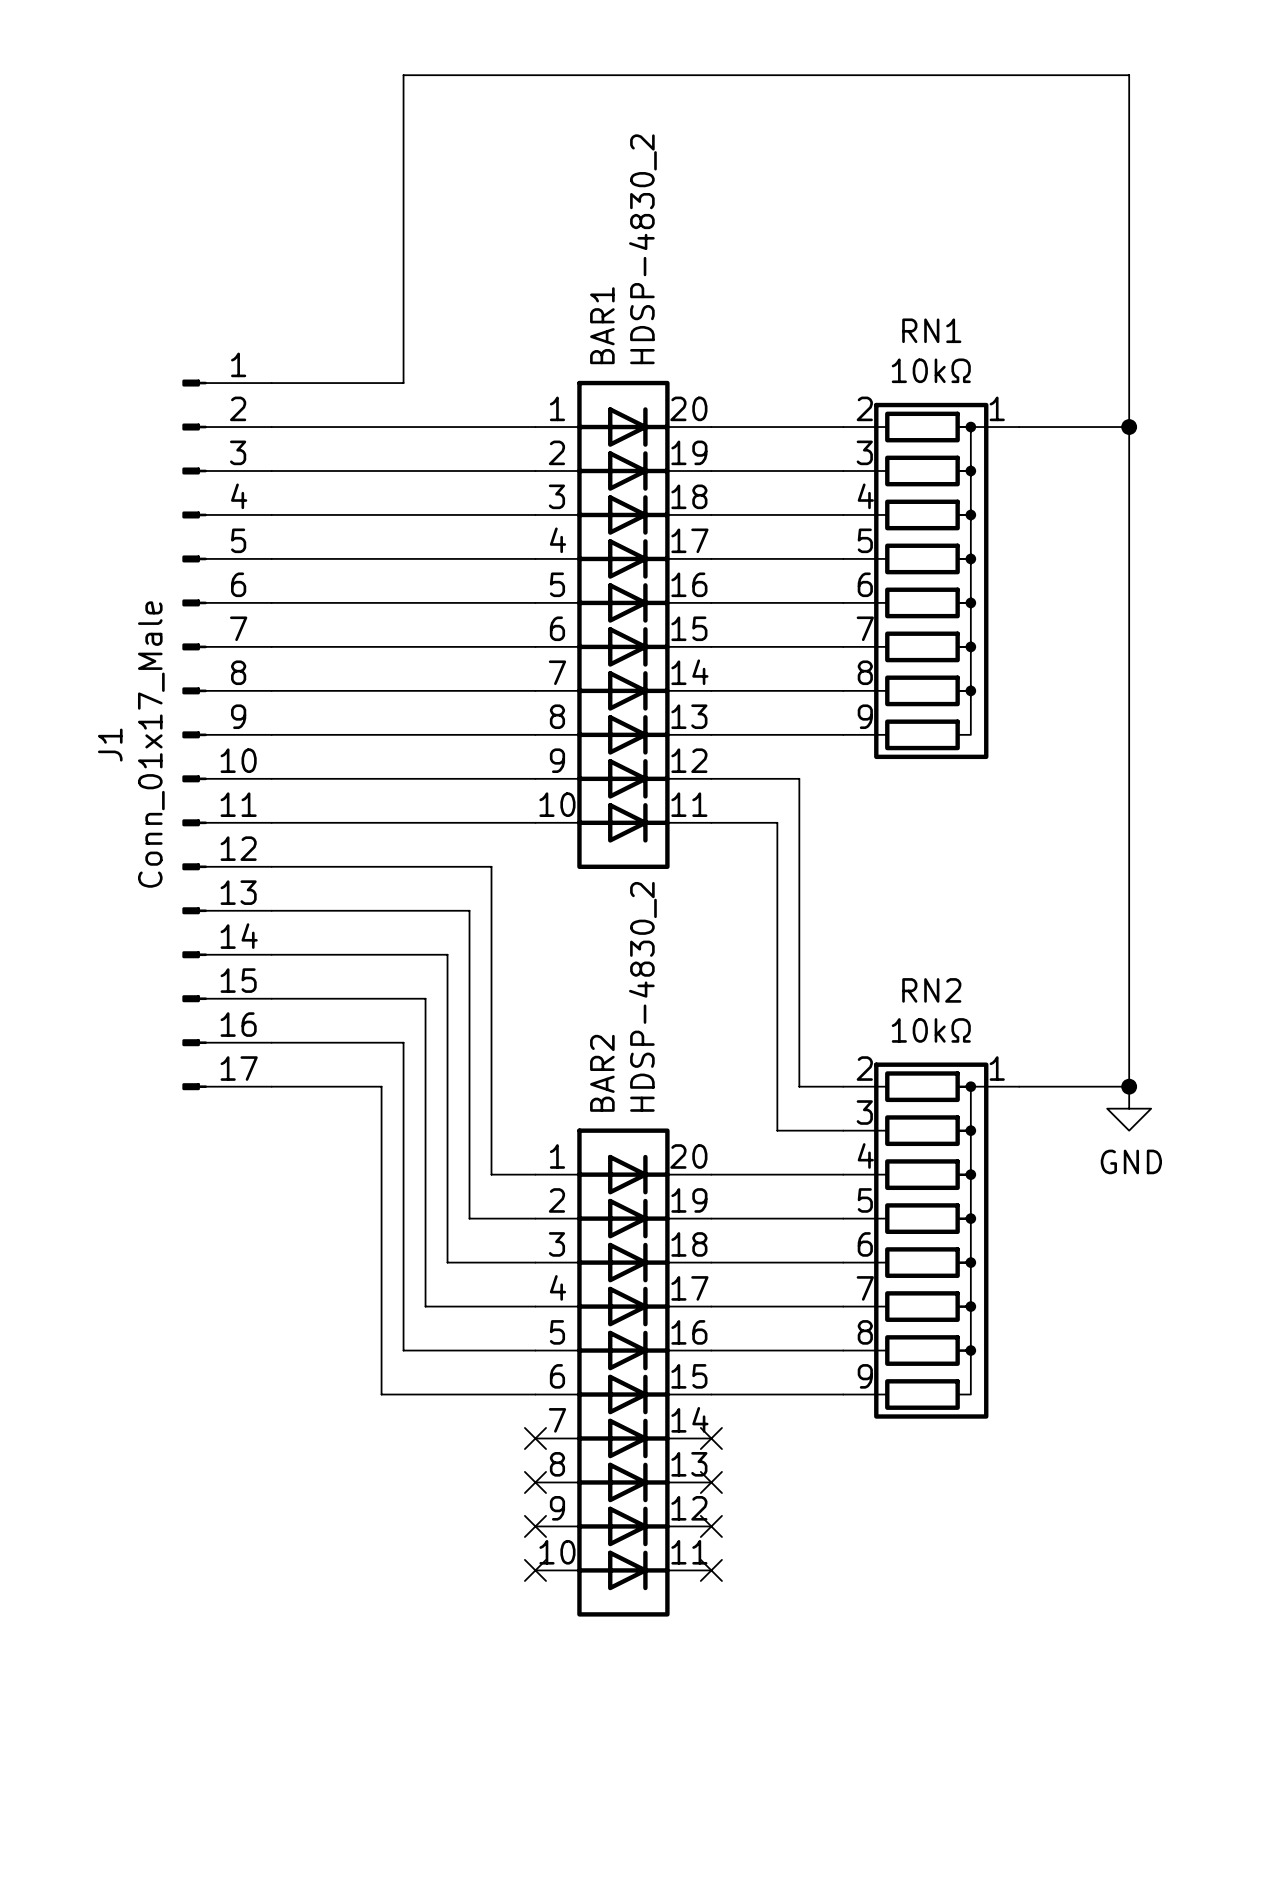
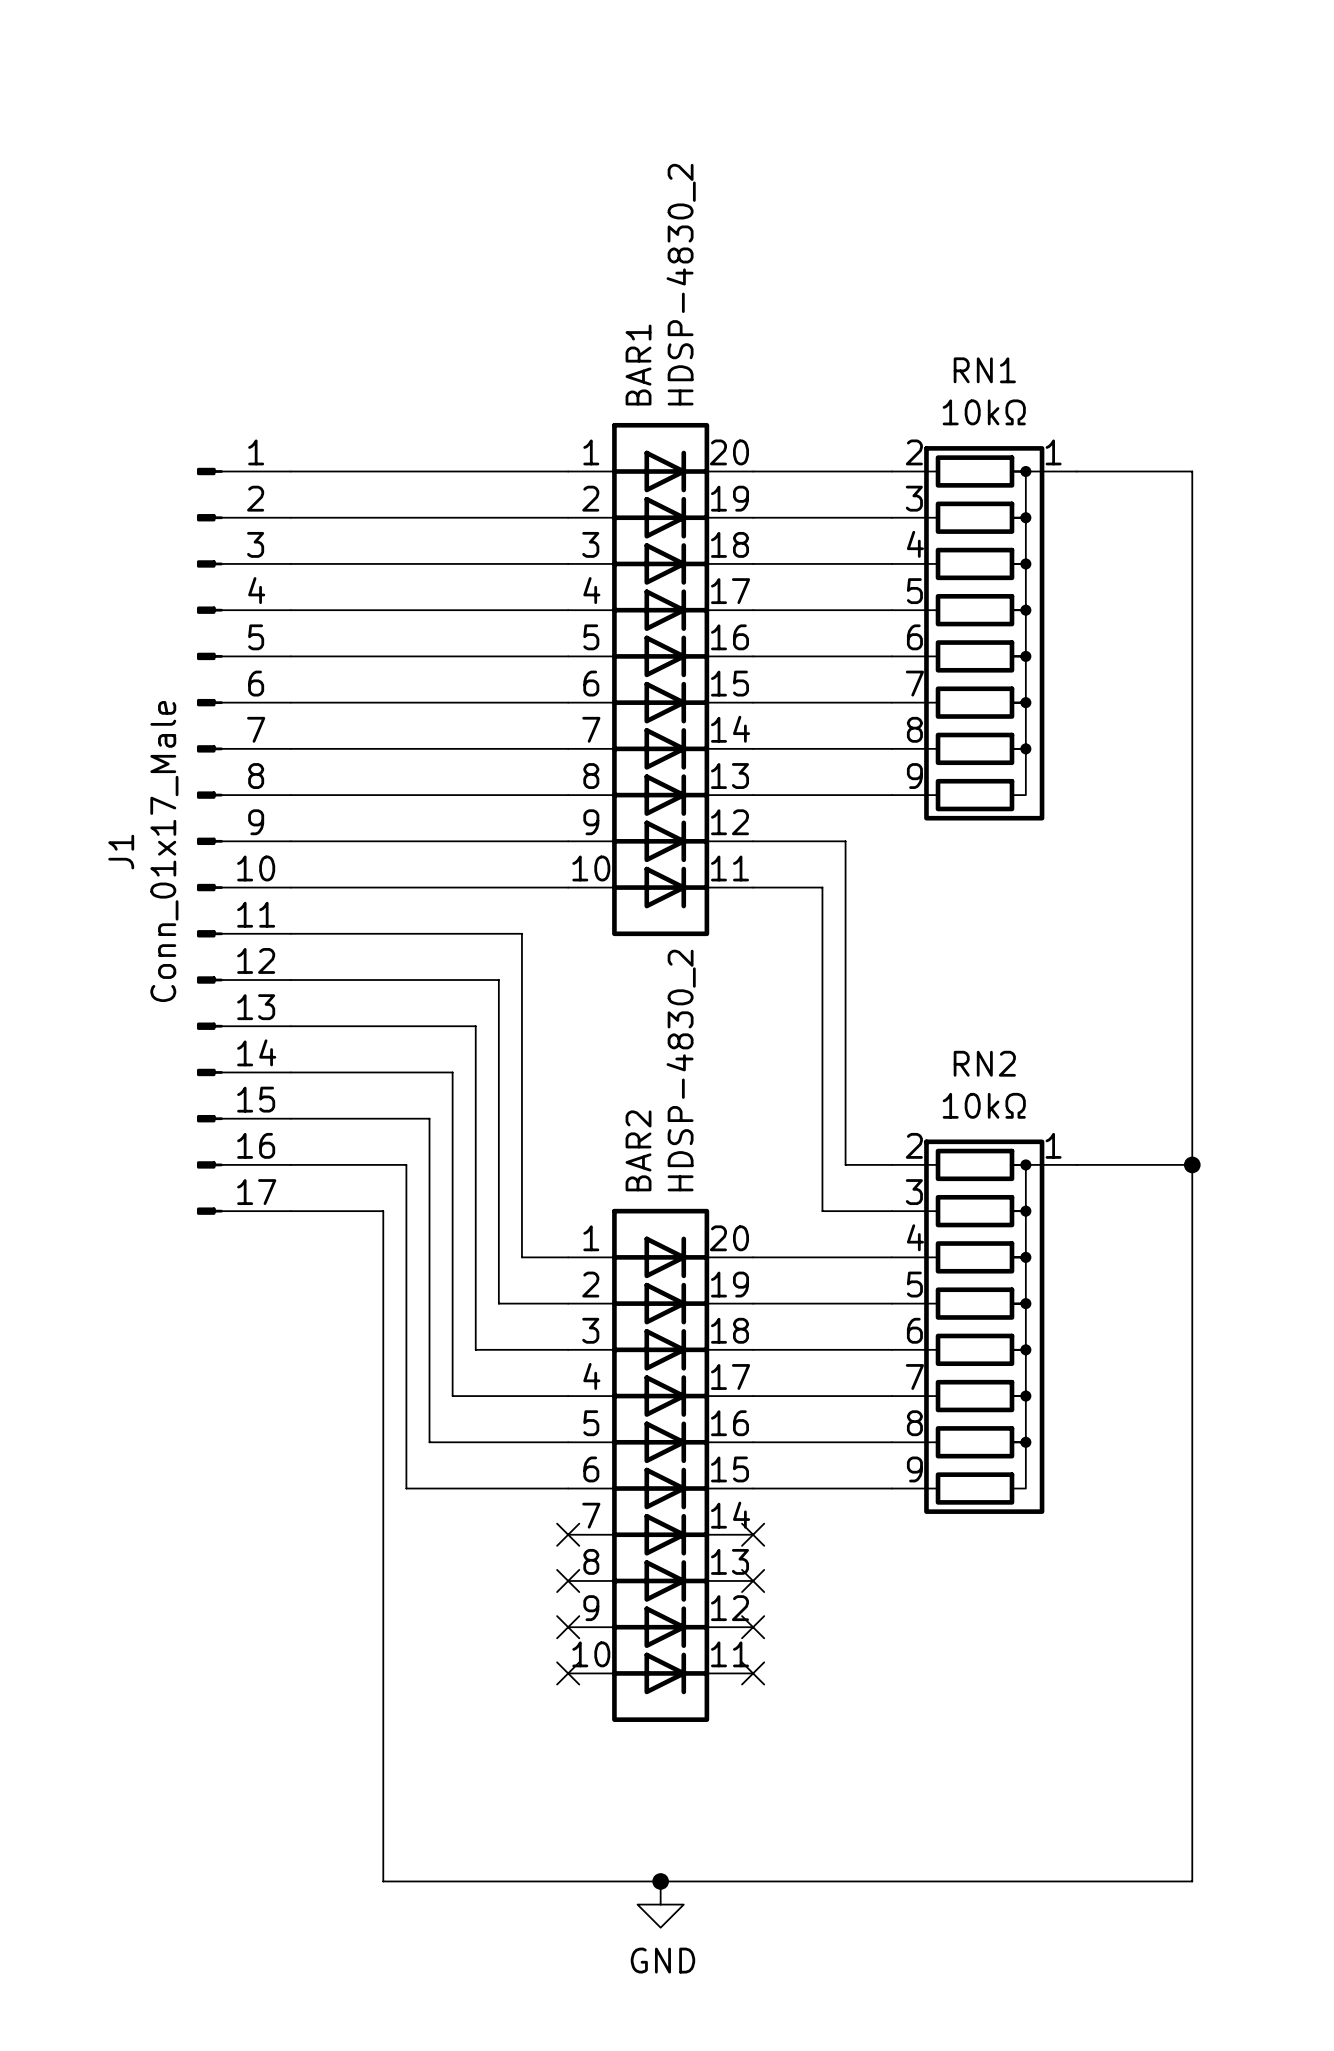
wire: (271, 383) (403, 383) (403, 75) (1129, 75) (1129, 427) -> none
junction: (1129, 427) -> none
J1 position: (226, 734) -> (243, 841)
wire: none -> (1192, 1164) (1192, 1881) (383, 1881) (383, 1211) (290, 1211)
power symbol: GND (1129, 1108) -> none
junction: none -> (660, 1881)
power symbol: none -> GND (660, 1904)

